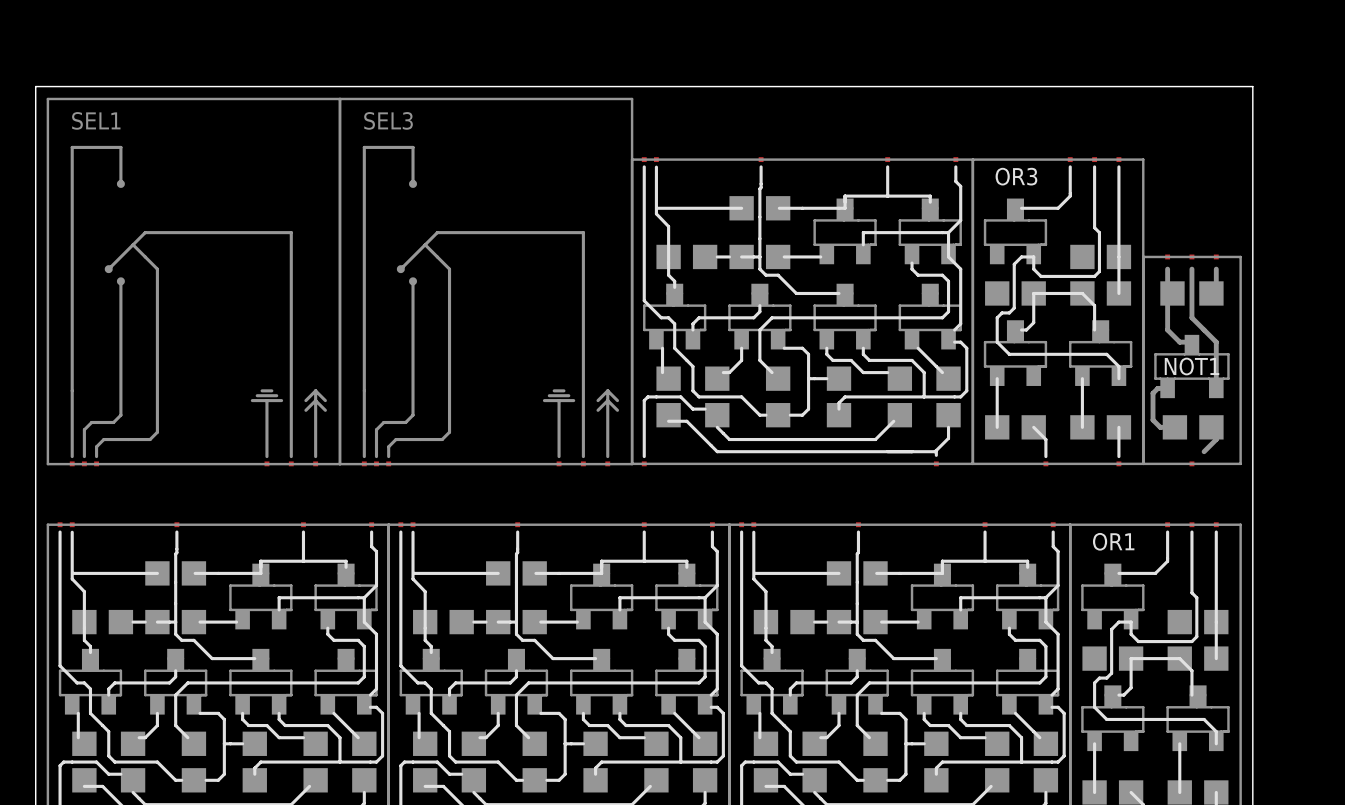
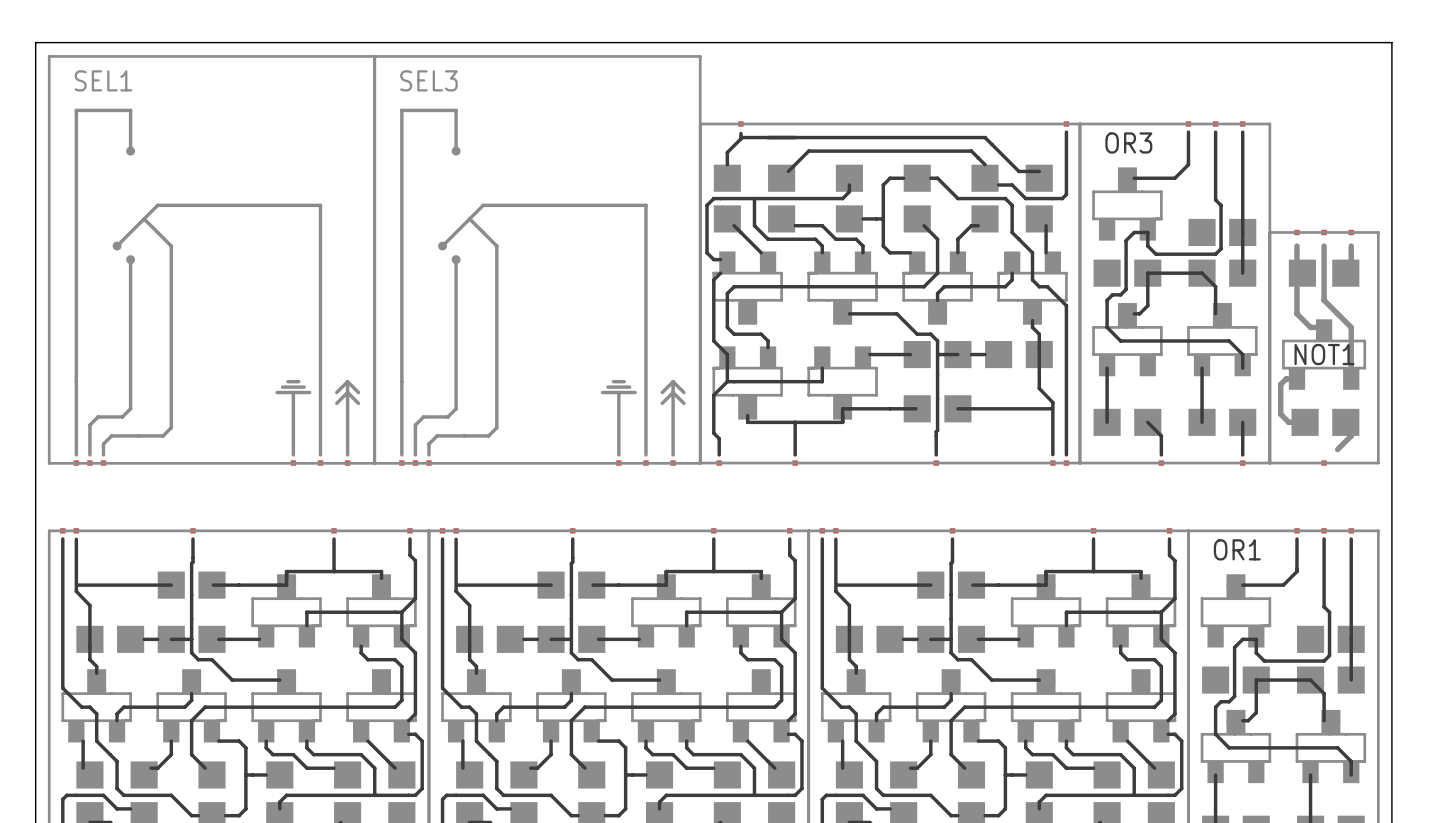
part rotation: 0° (802, 311) -> 180° (890, 293)

